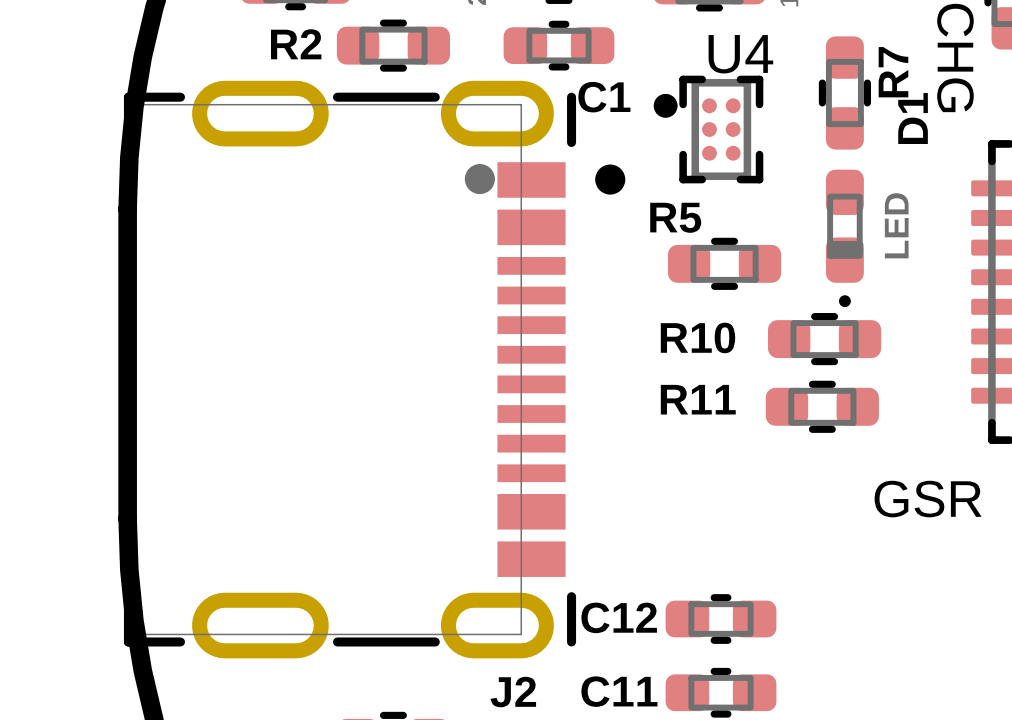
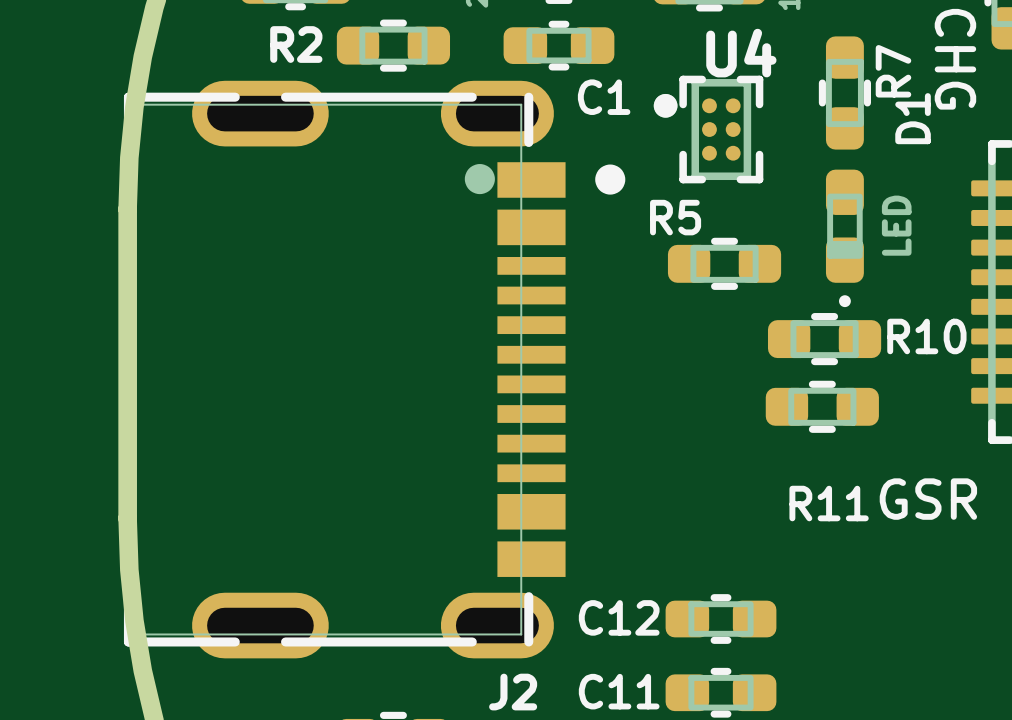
J2 footprint: [123, 80, 626, 659] -> [123, 80, 626, 659]
R10 name position: R10 (697, 337) -> R10 (926, 336)
R11 name position: R11 (698, 399) -> R11 (829, 503)

